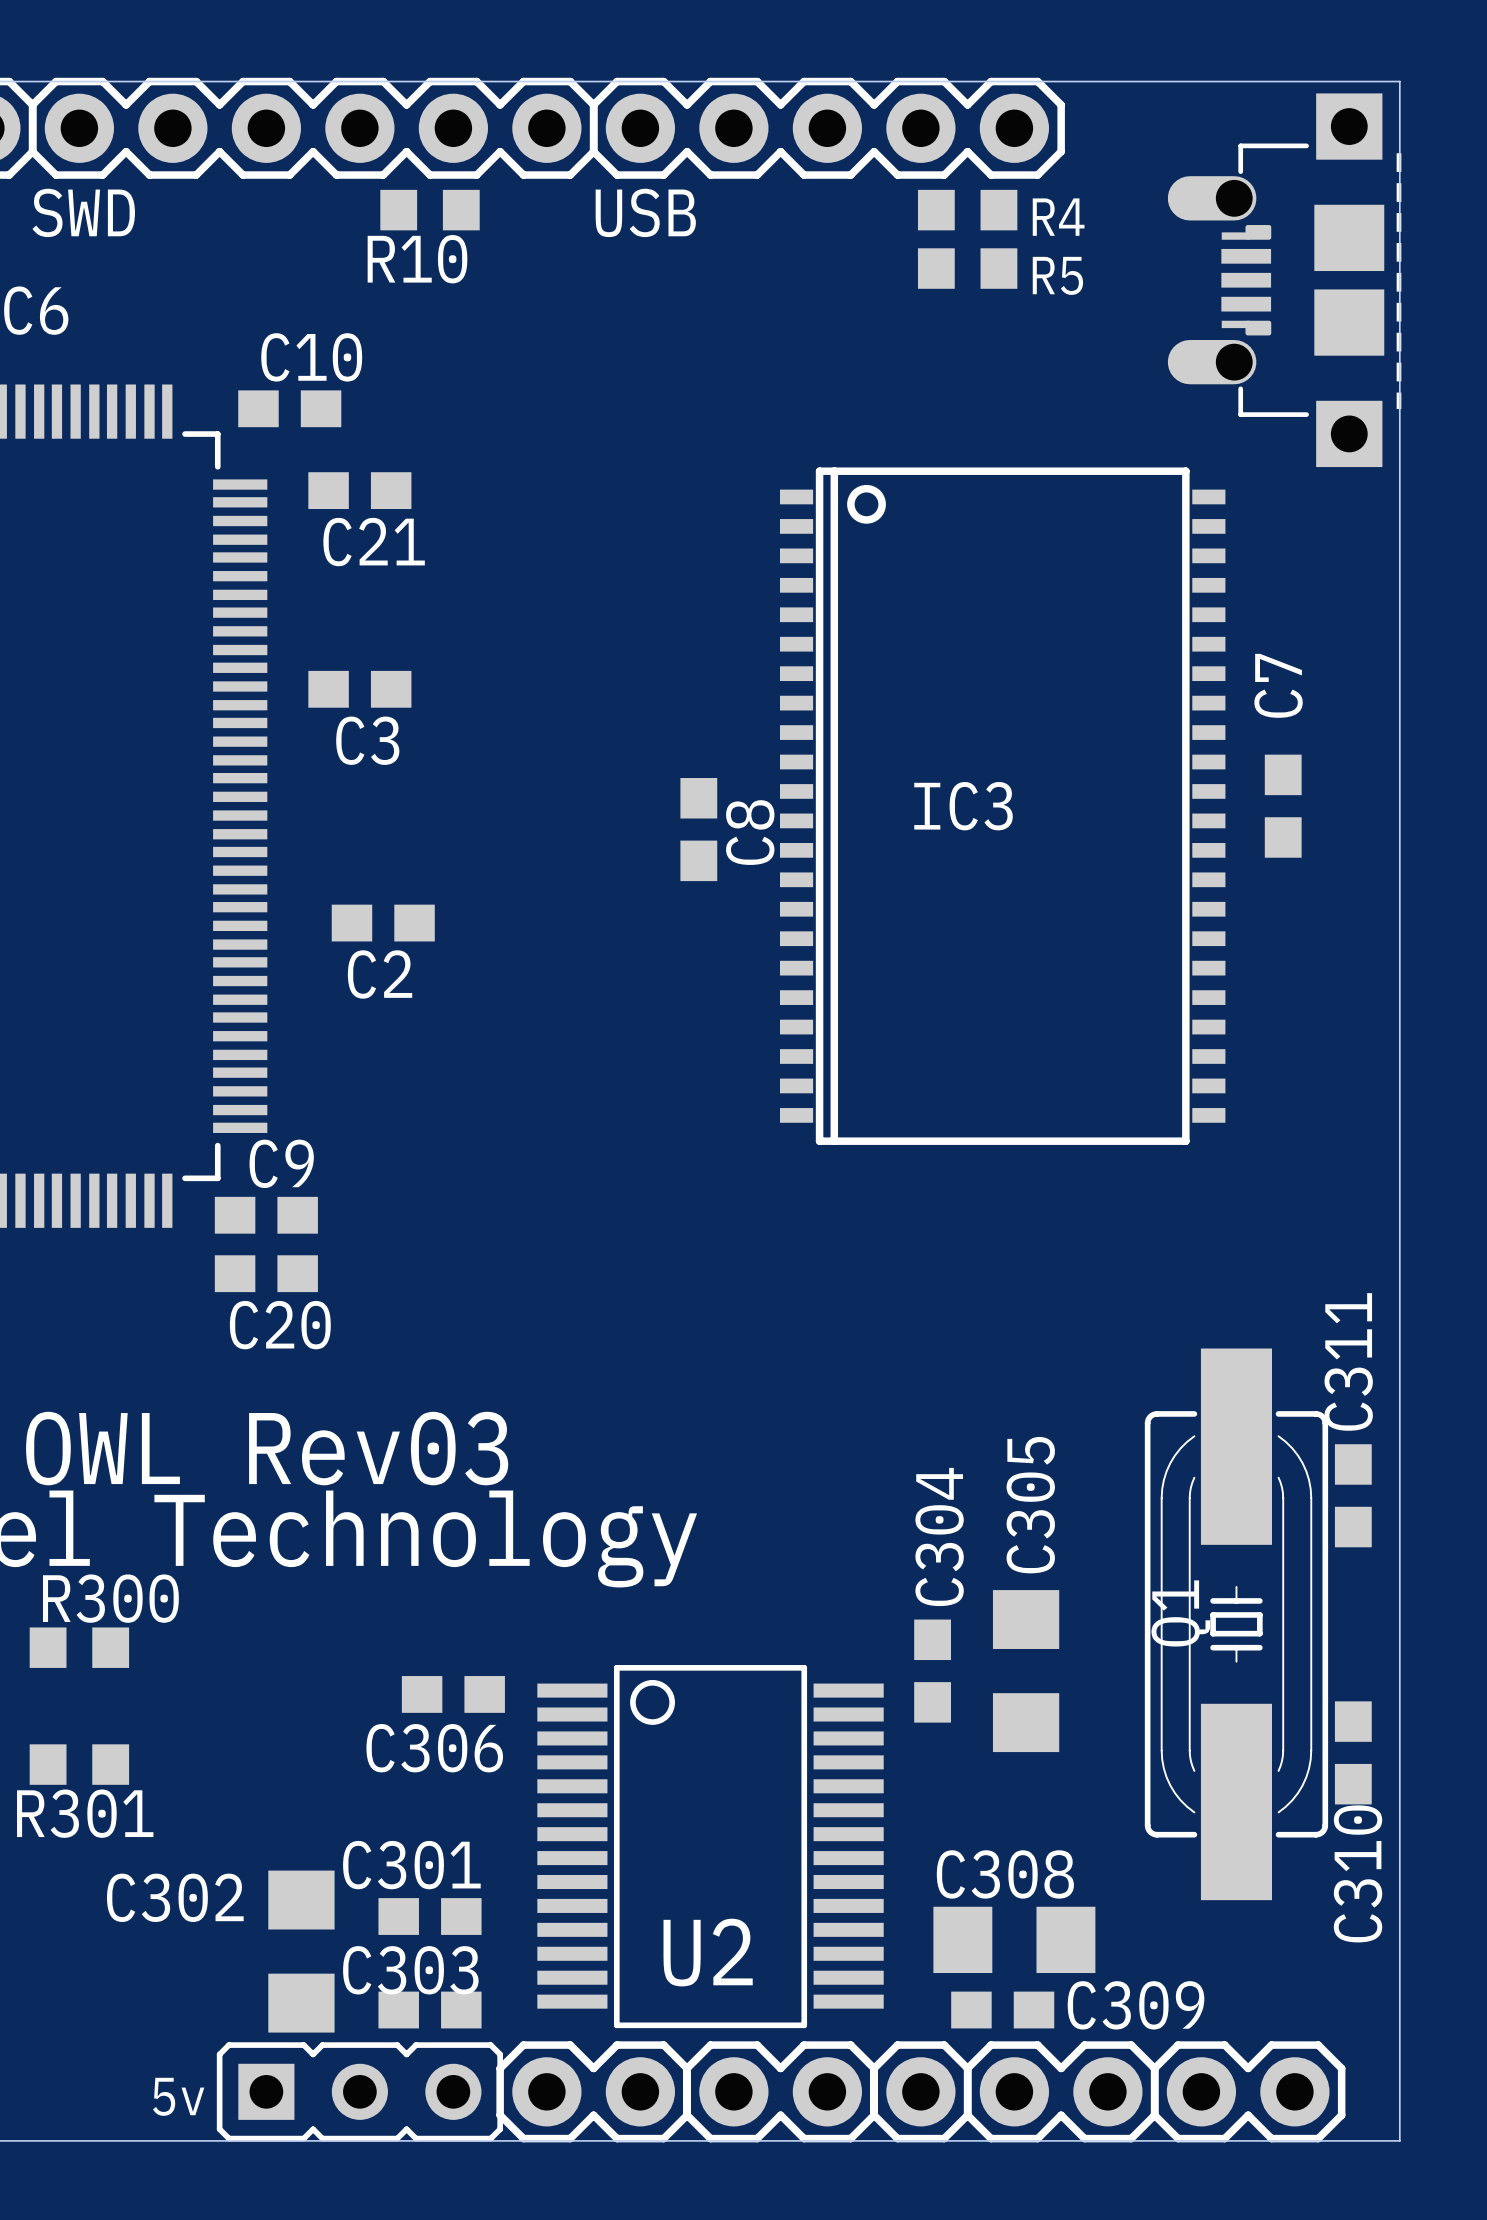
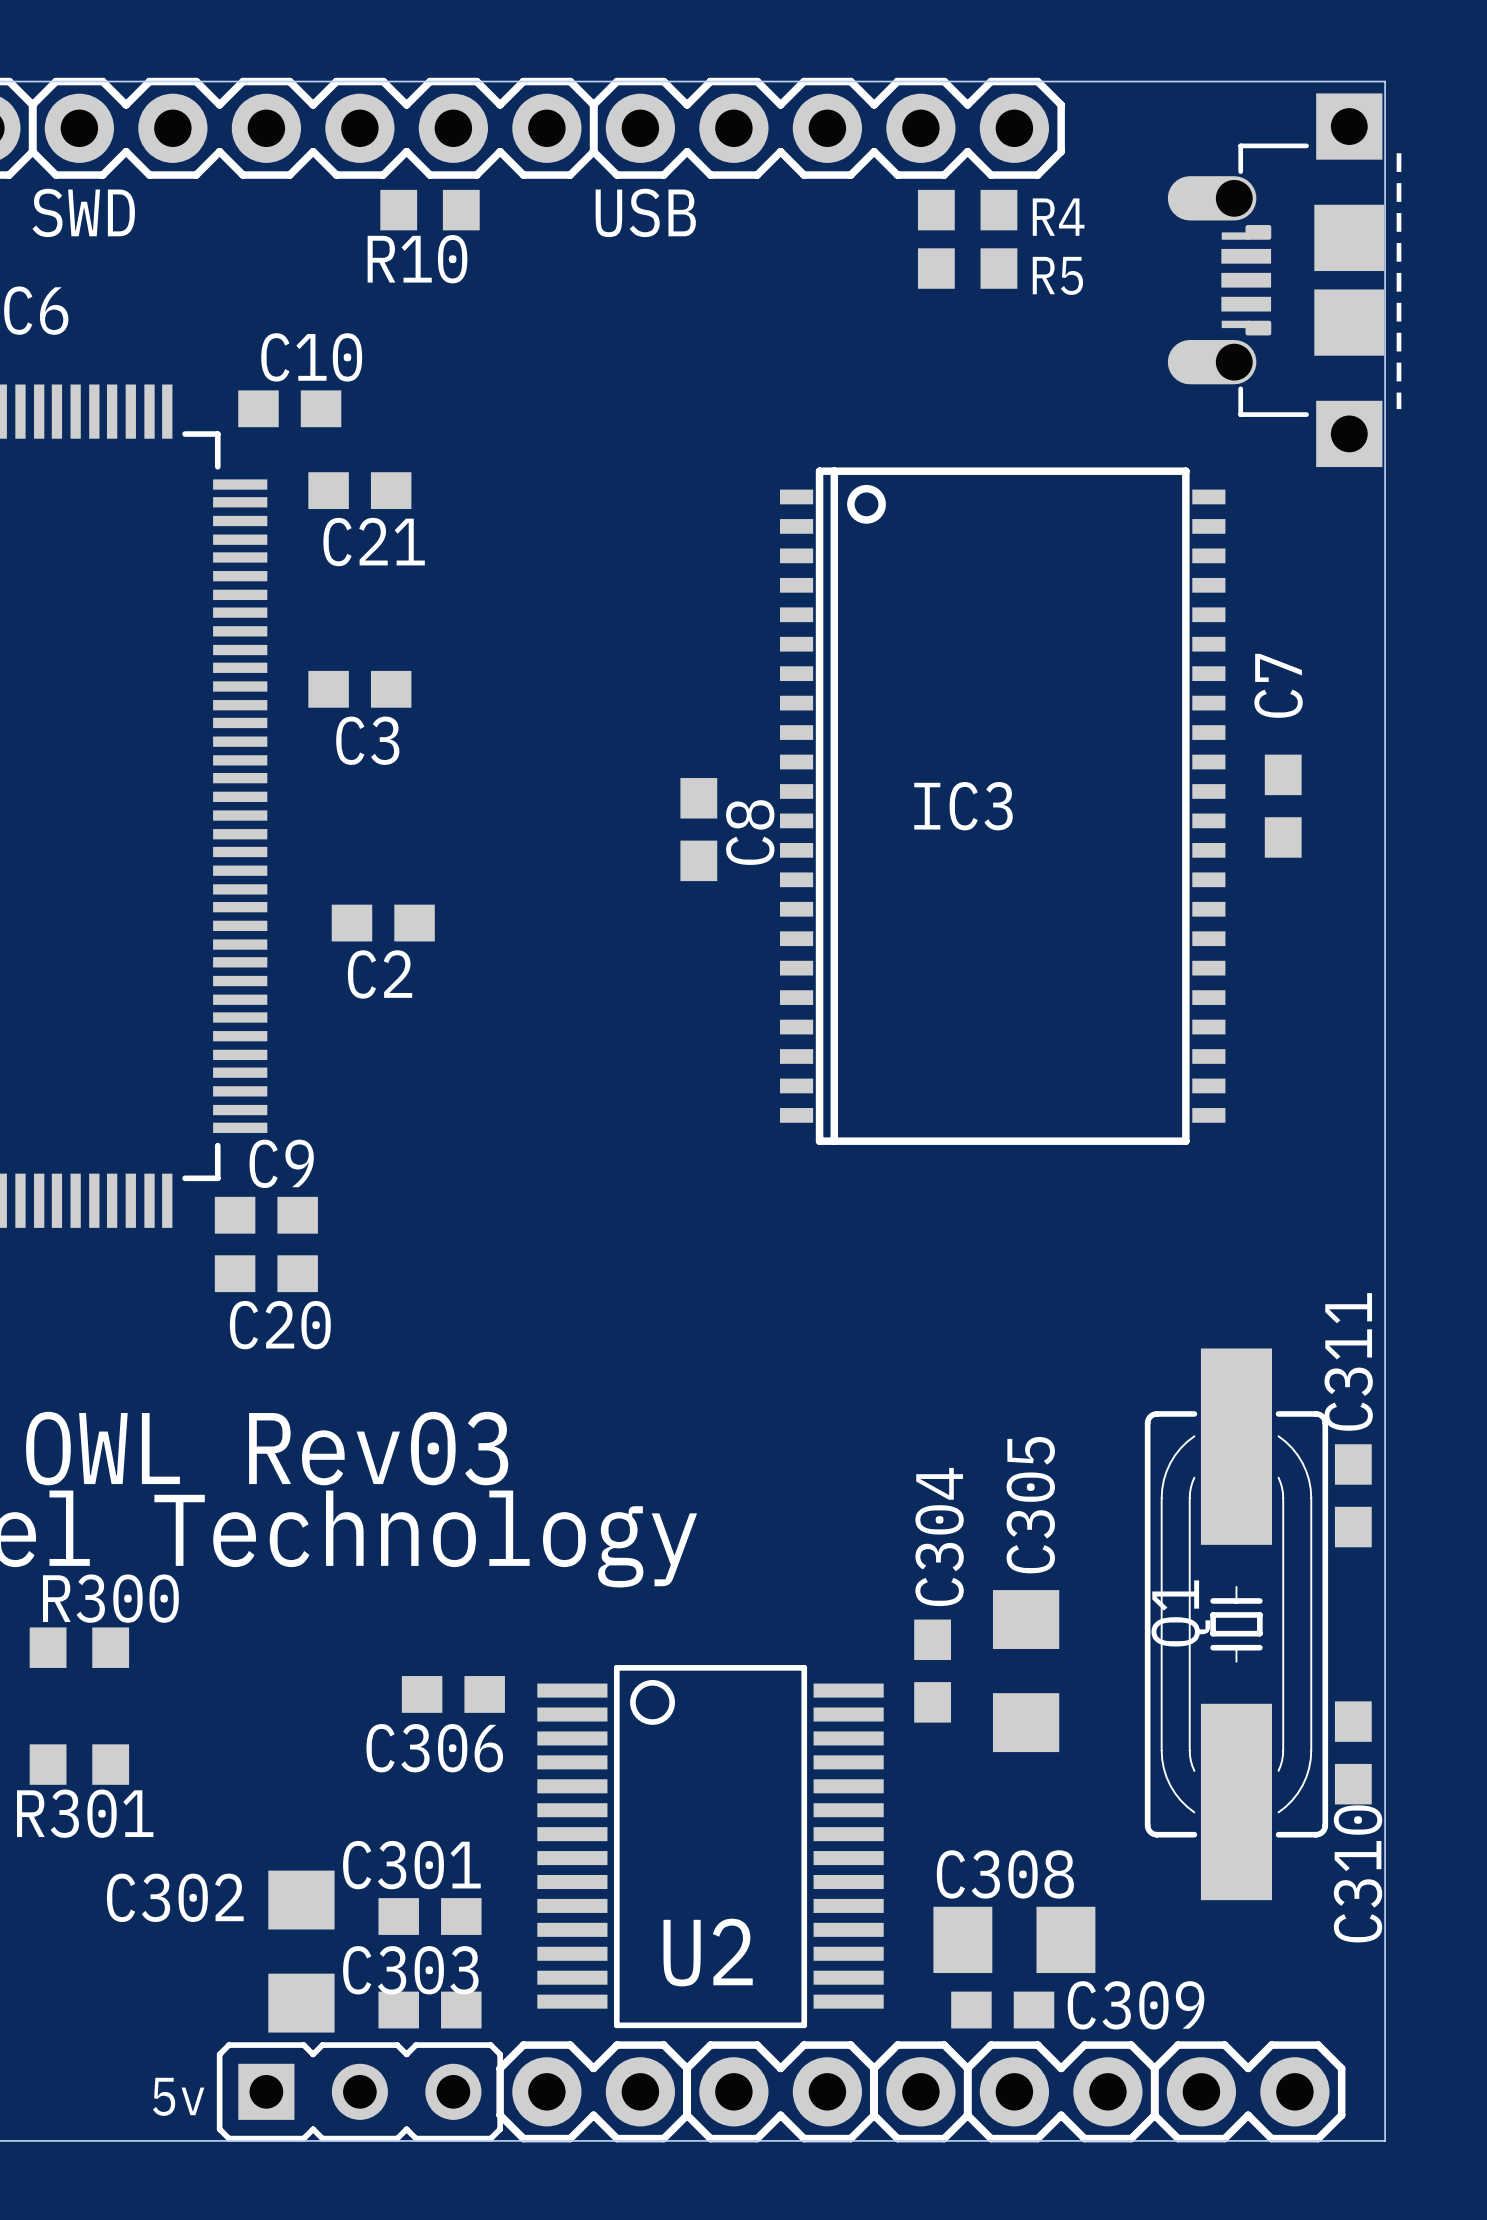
board edge: (1385, 81) (1399, 81) (1399, 2140) (1385, 2140) -> (1385, 81) (1385, 2140)

